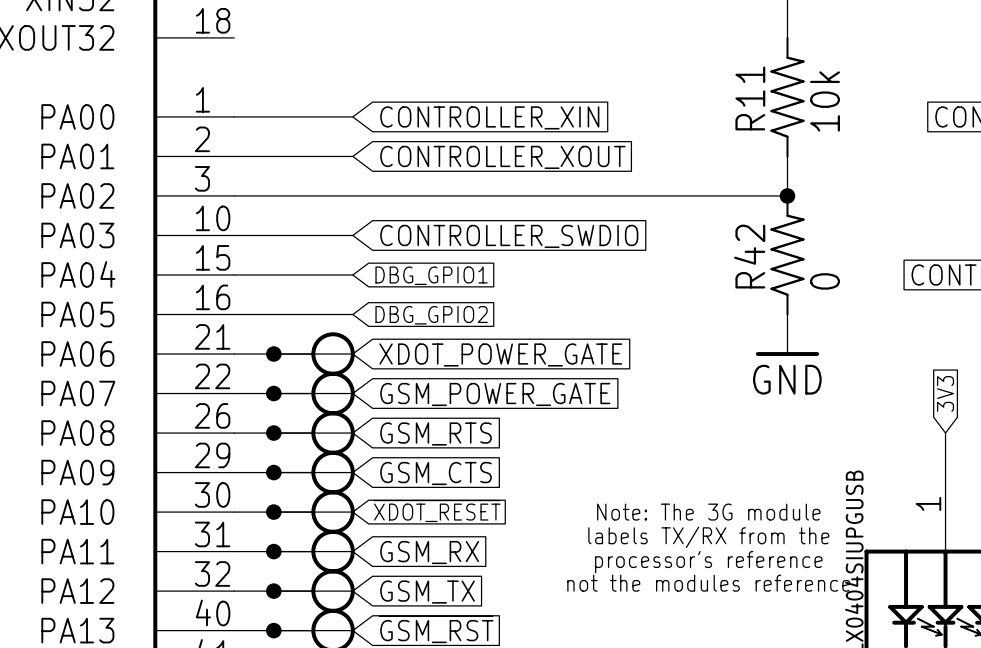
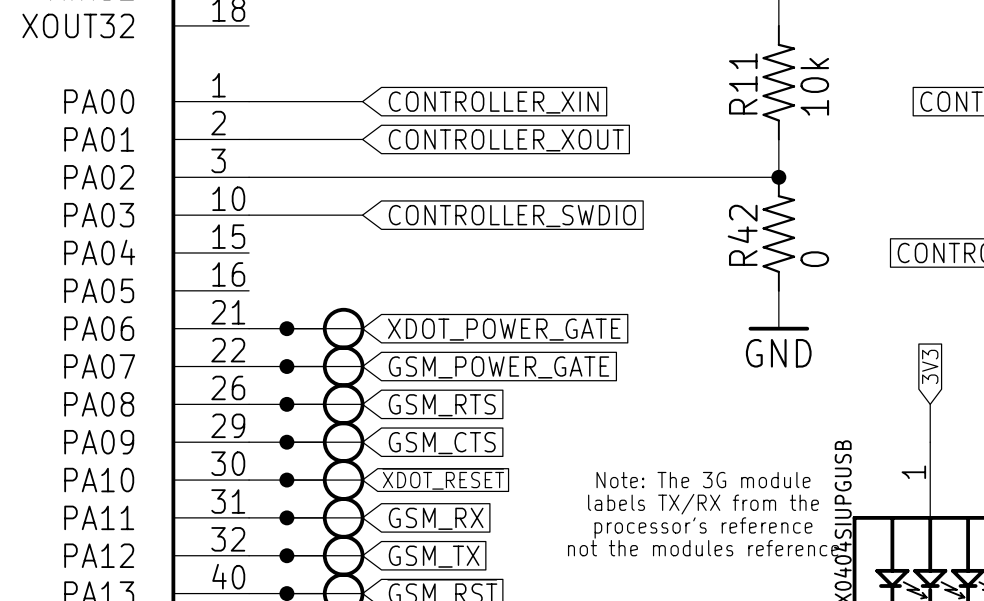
wire: (234, 274) (352, 274) -> none
global label: DBG_GPIO1 (431, 275) -> none
wire: (234, 314) (352, 314) -> none
global label: DBG_GPIO2 (431, 315) -> none

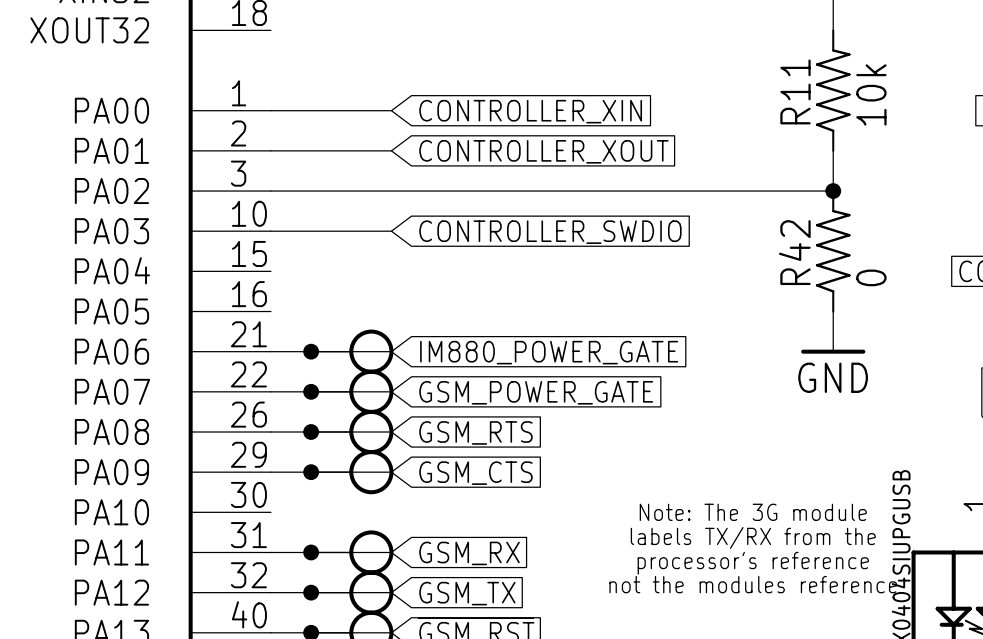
global label: XDOT_POWER_GATE (504, 329) -> IM880_POWER_GATE (549, 352)
global label: ~{XDOT_RESET} (443, 479) -> none
wire: (249, 480) (362, 480) -> none
junction: (286, 480) -> none
part: (325, 480) -> none

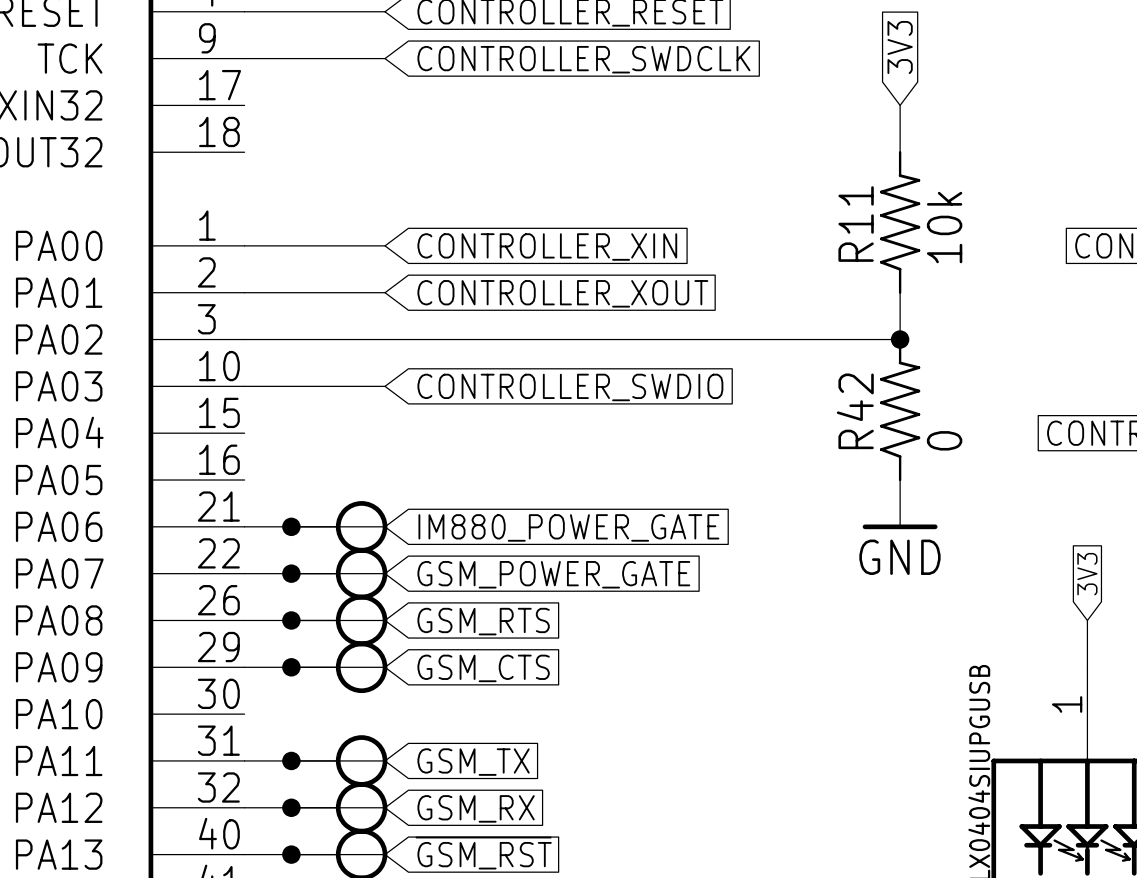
text: Note: The 3G module (753, 512) -> none
text: labels TX/RX from the (753, 537) -> none
global label: GSM_RX (469, 553) -> GSM_TX (473, 762)
text: processor's reference (753, 563) -> none
text: not the modules reference (753, 584) -> none
global label: GSM_TX (467, 593) -> GSM_RX (476, 808)

